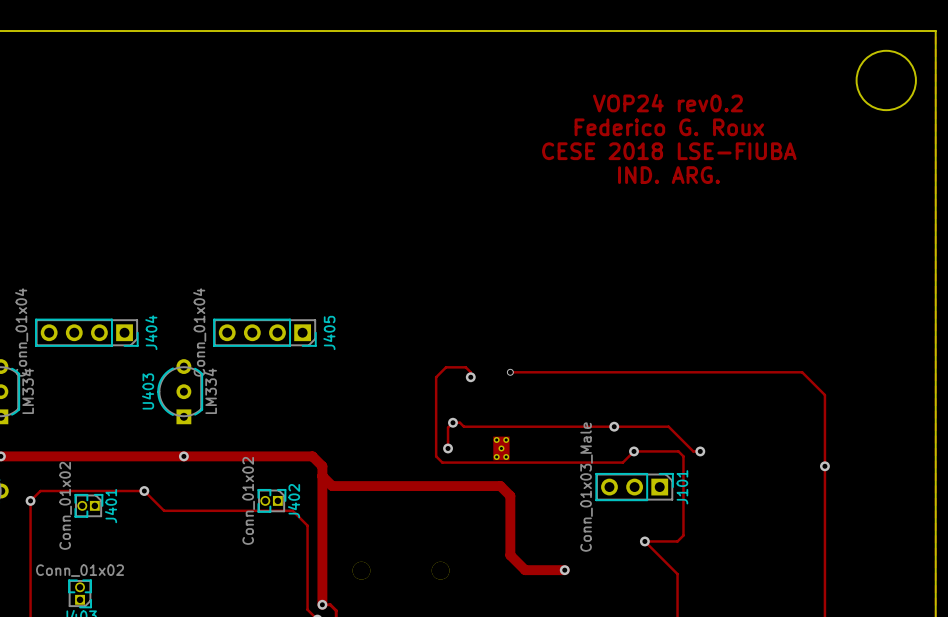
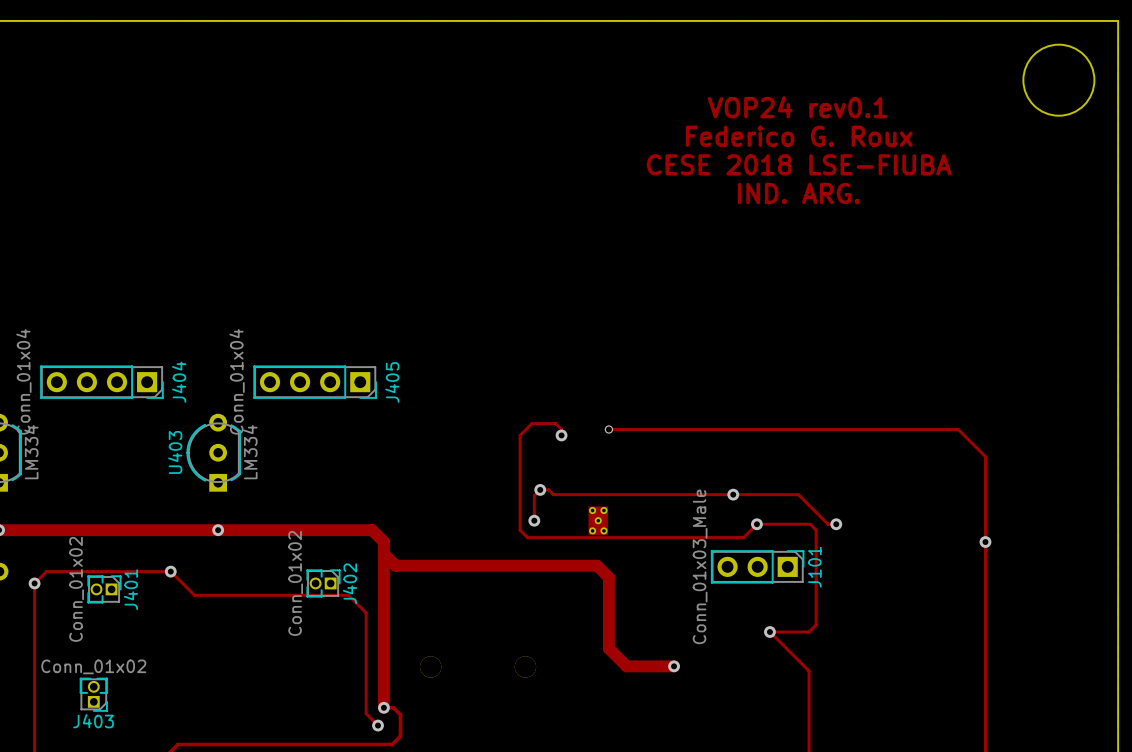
text: VOP24 rev0.2 (667, 103) -> VOP24 rev0.1 (797, 107)

